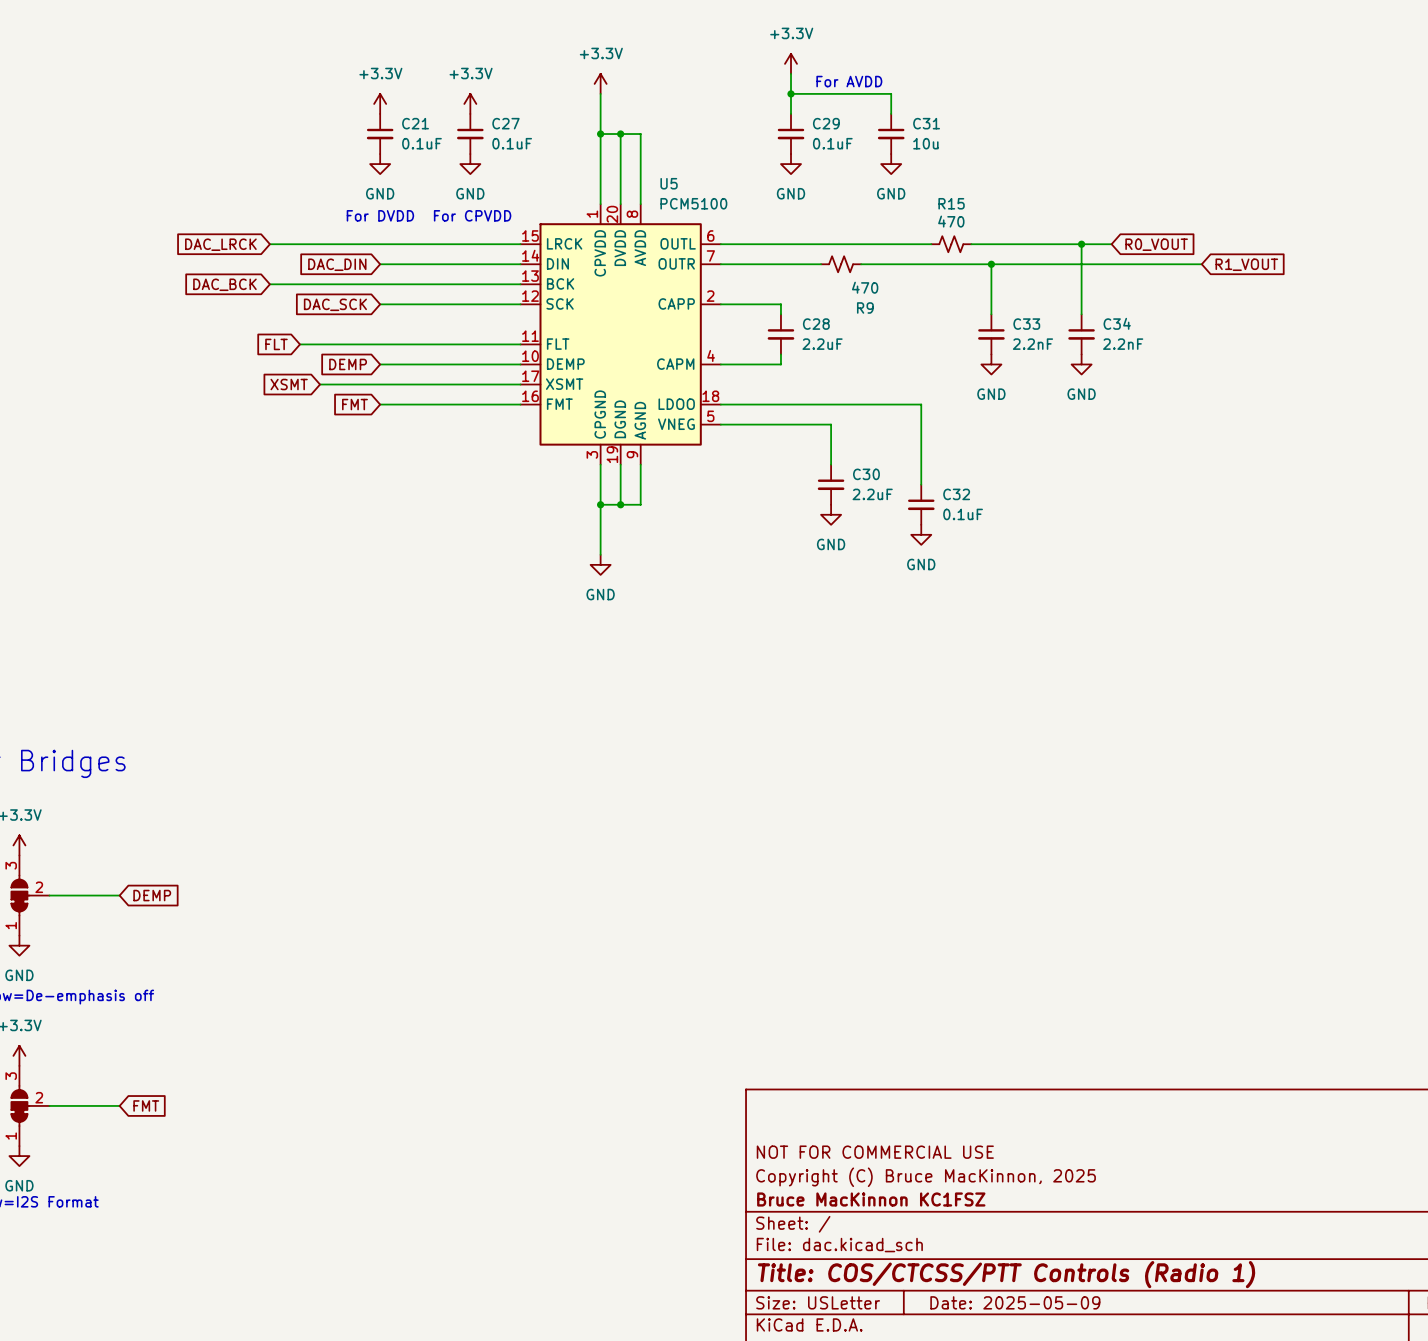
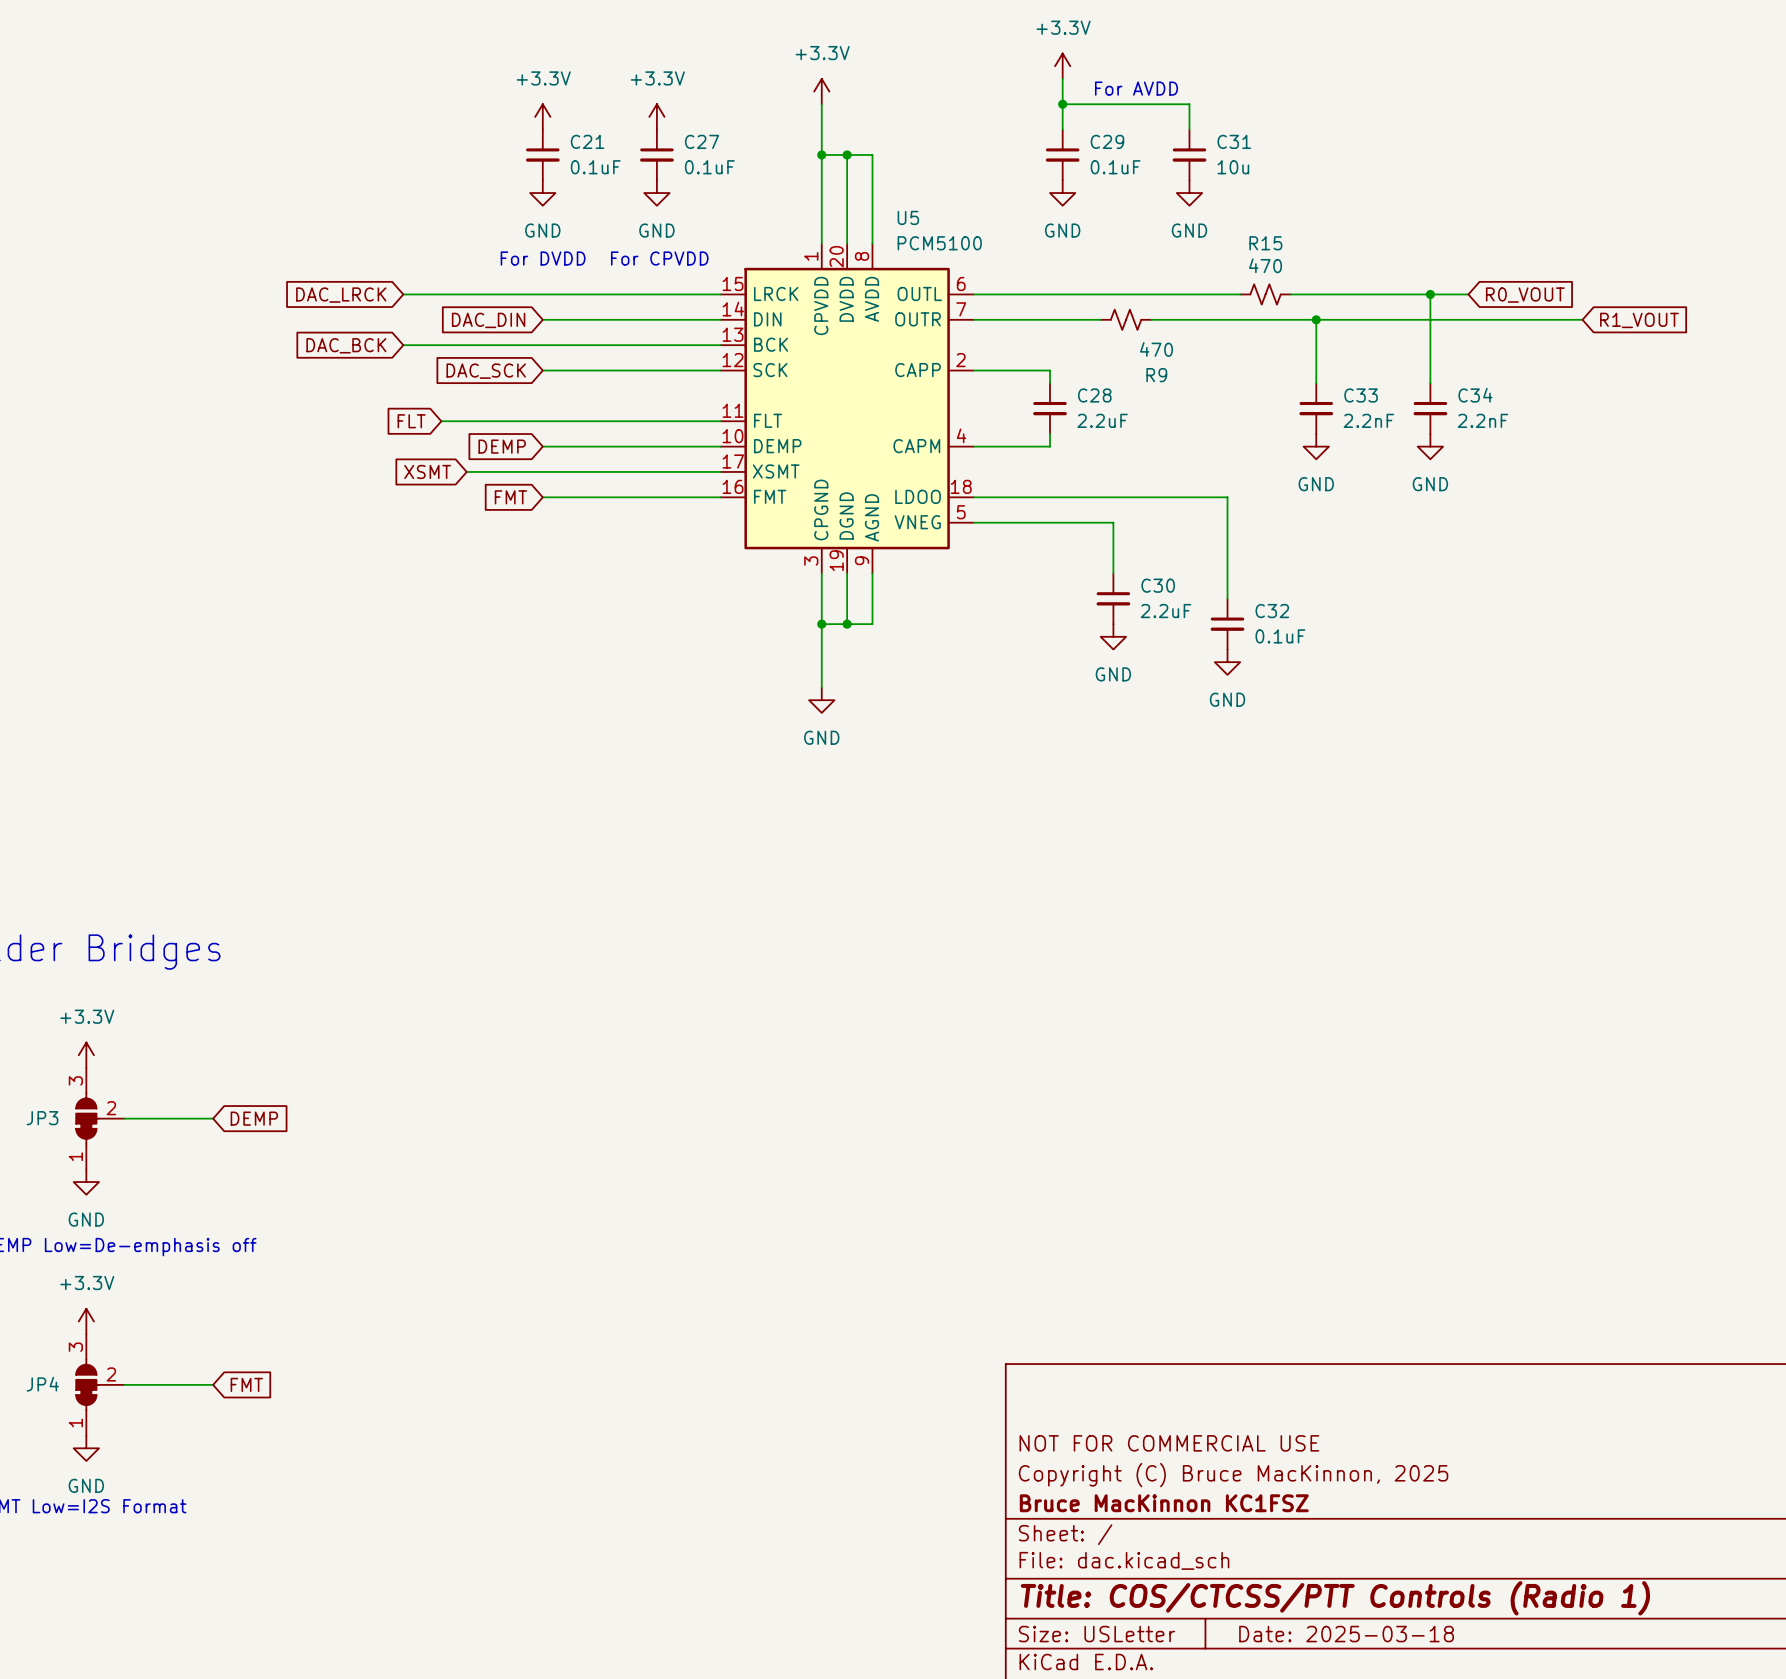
title block: Date: 2025-05-09 (1015, 1302) -> Date: 2025-03-18 (1346, 1634)

